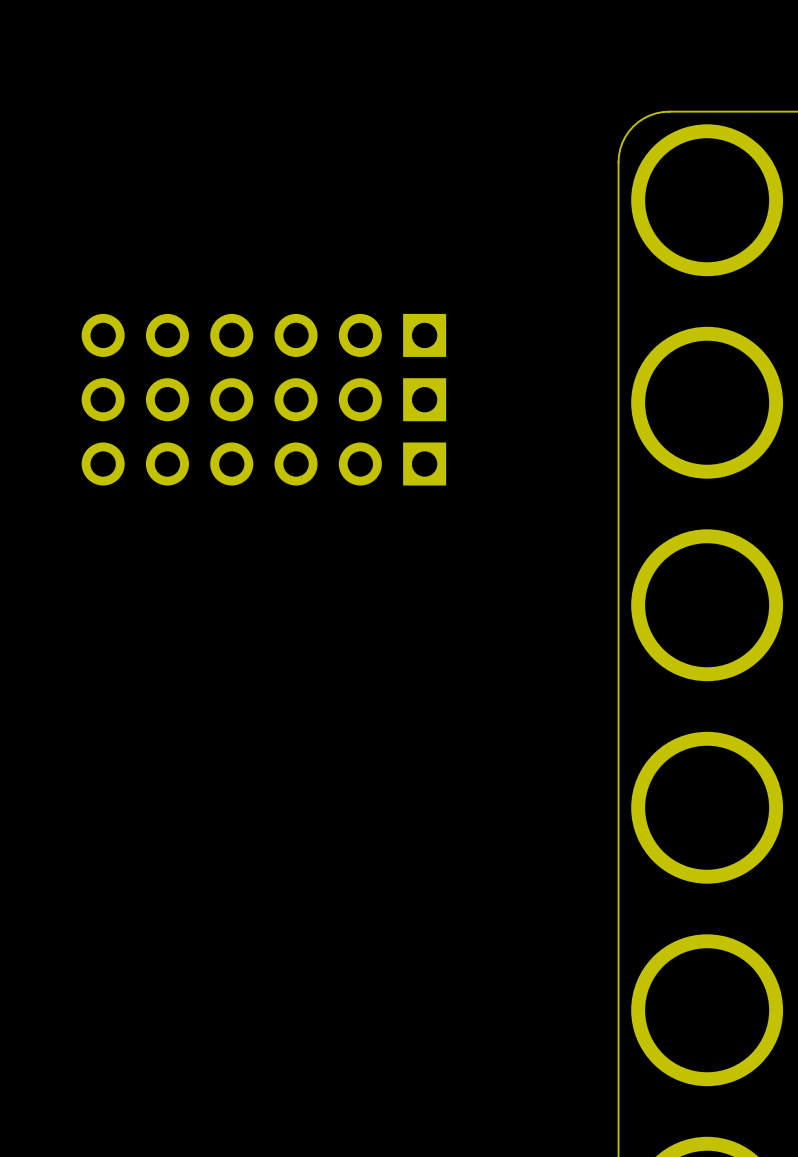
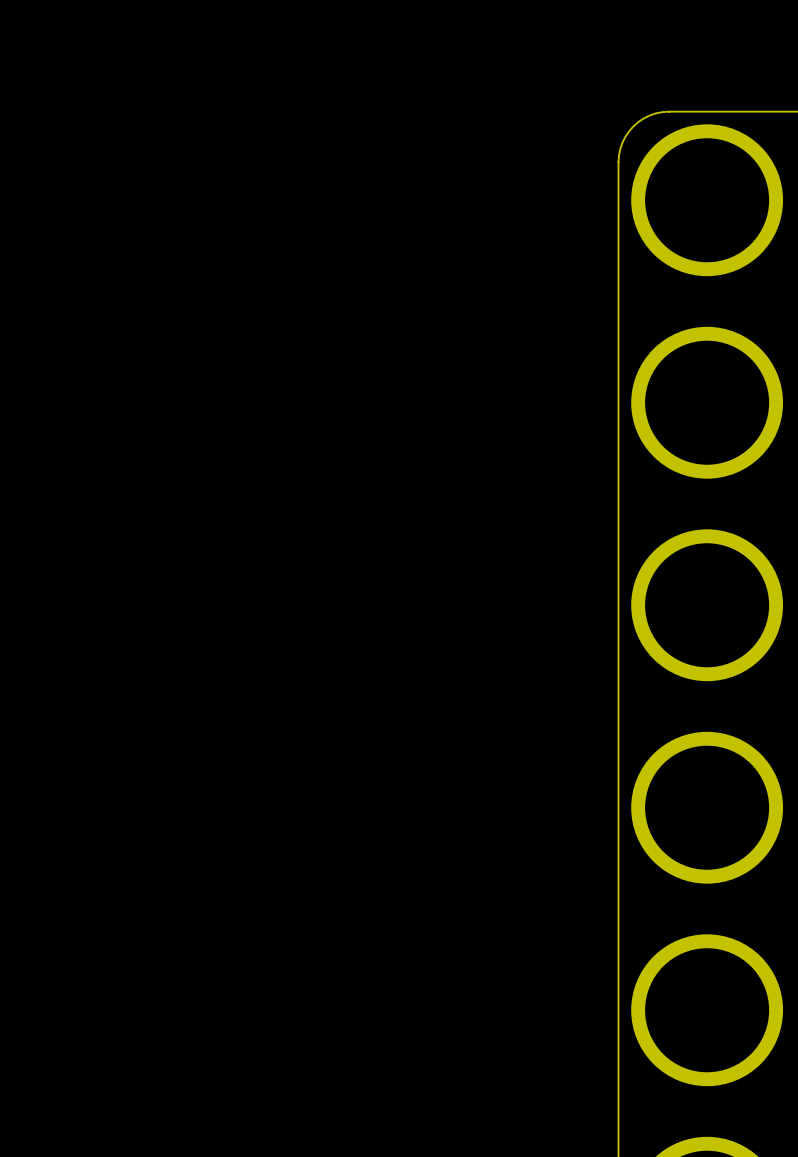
part: (263, 335) -> none
part: (263, 399) -> none
part: (263, 464) -> none

